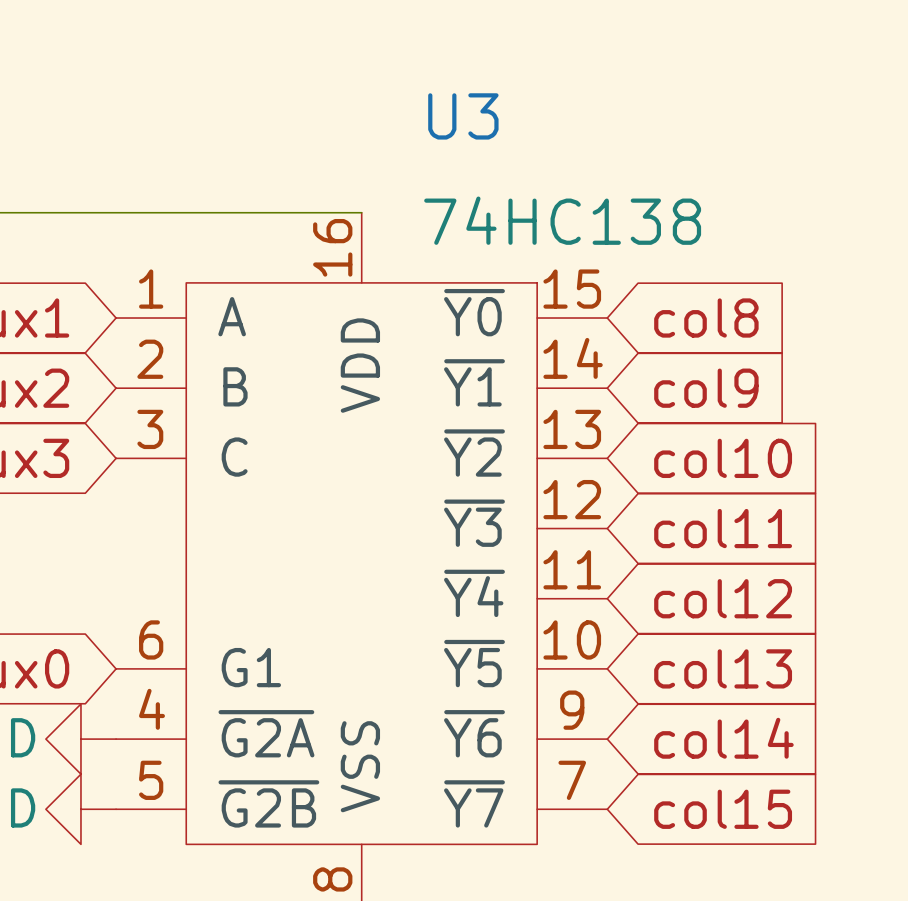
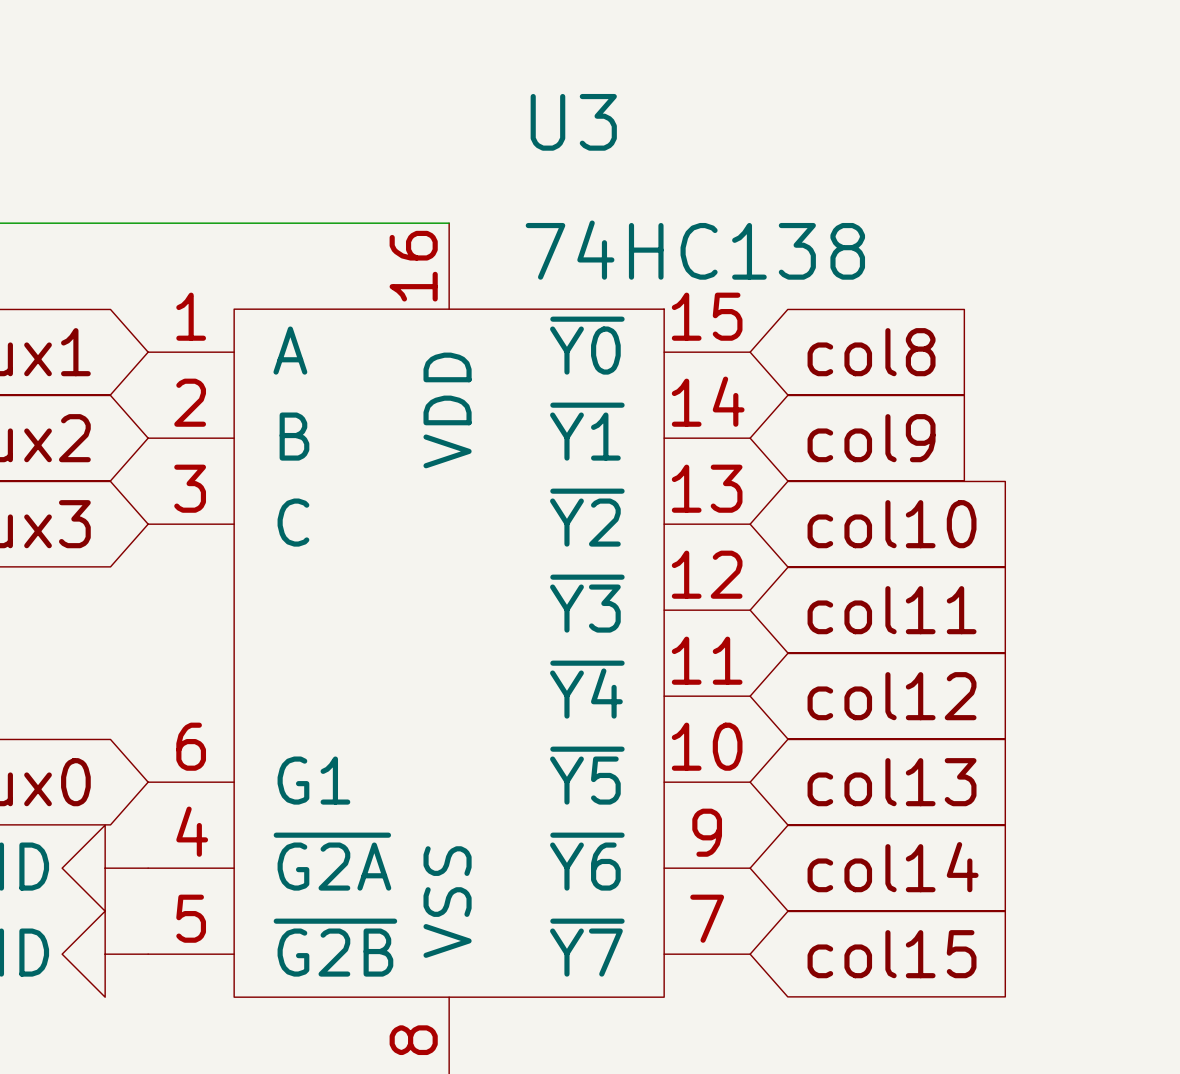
U3 name position: U3 (463, 116) -> U3 (573, 122)
U3 value position: 74HC138 (562, 220) -> 74HC138 (695, 250)

